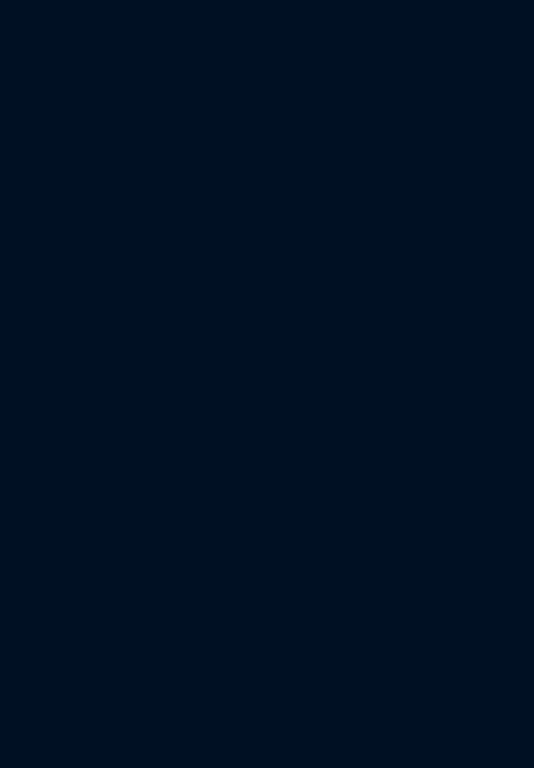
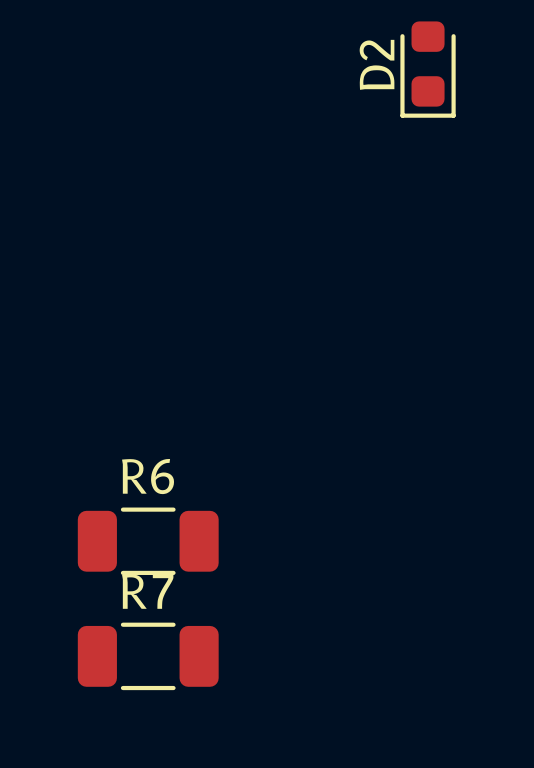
D2: none -> (428, 69)
R6: none -> (148, 541)
R7: none -> (148, 656)

